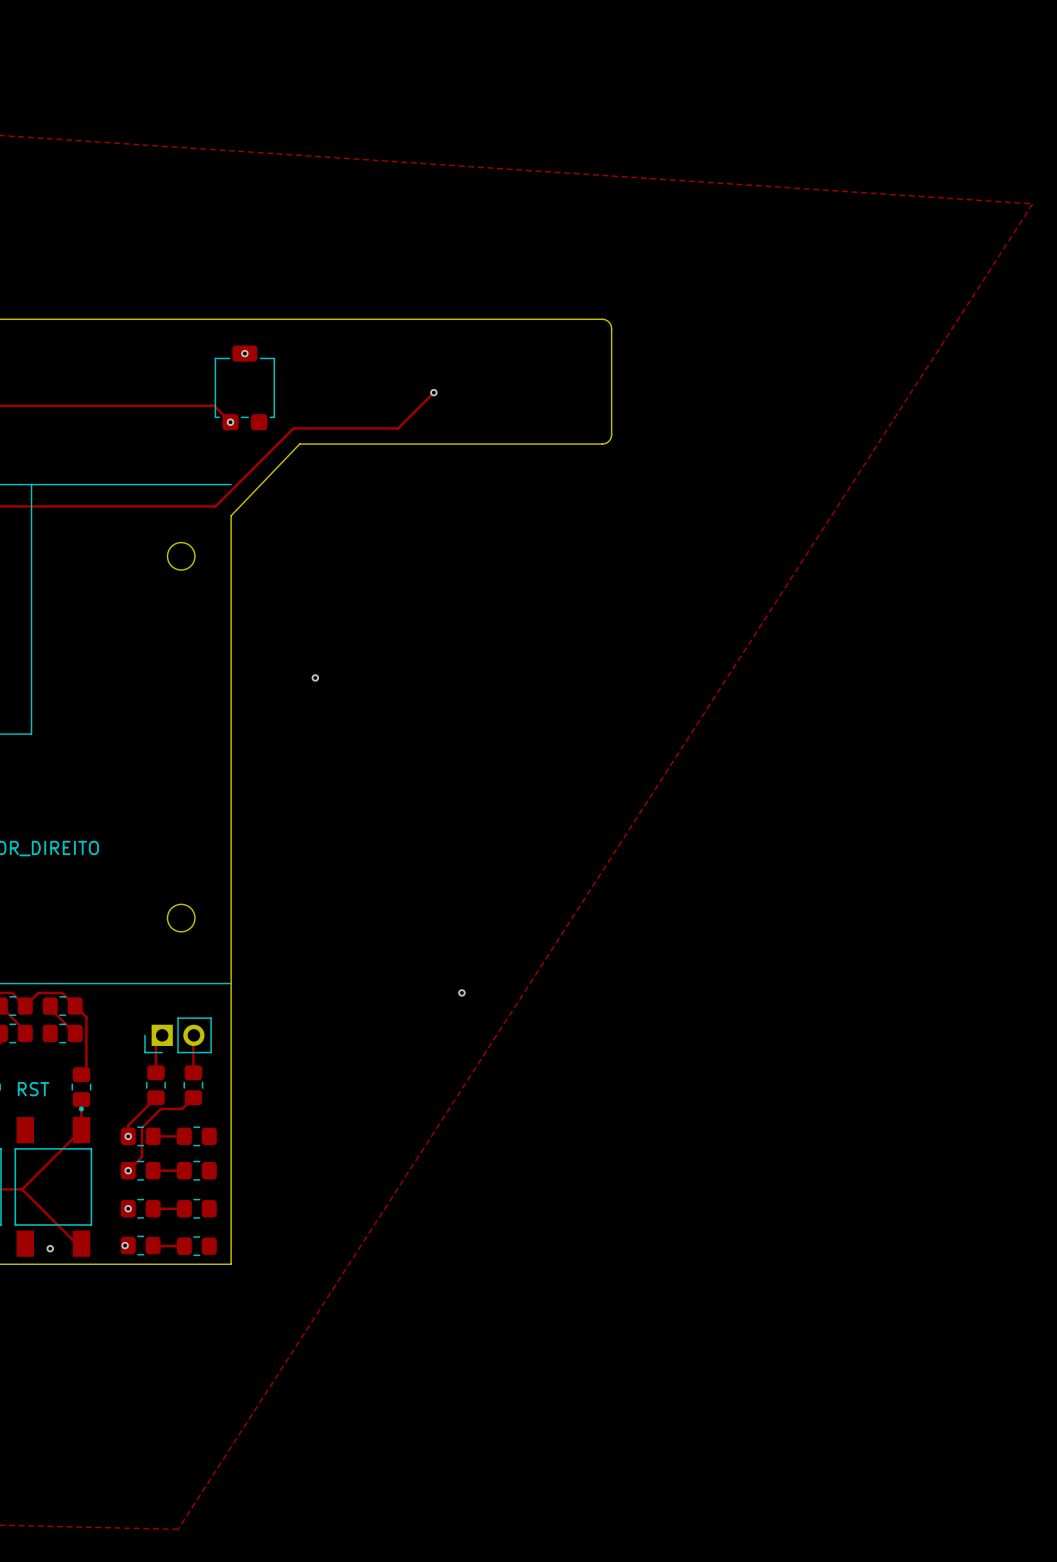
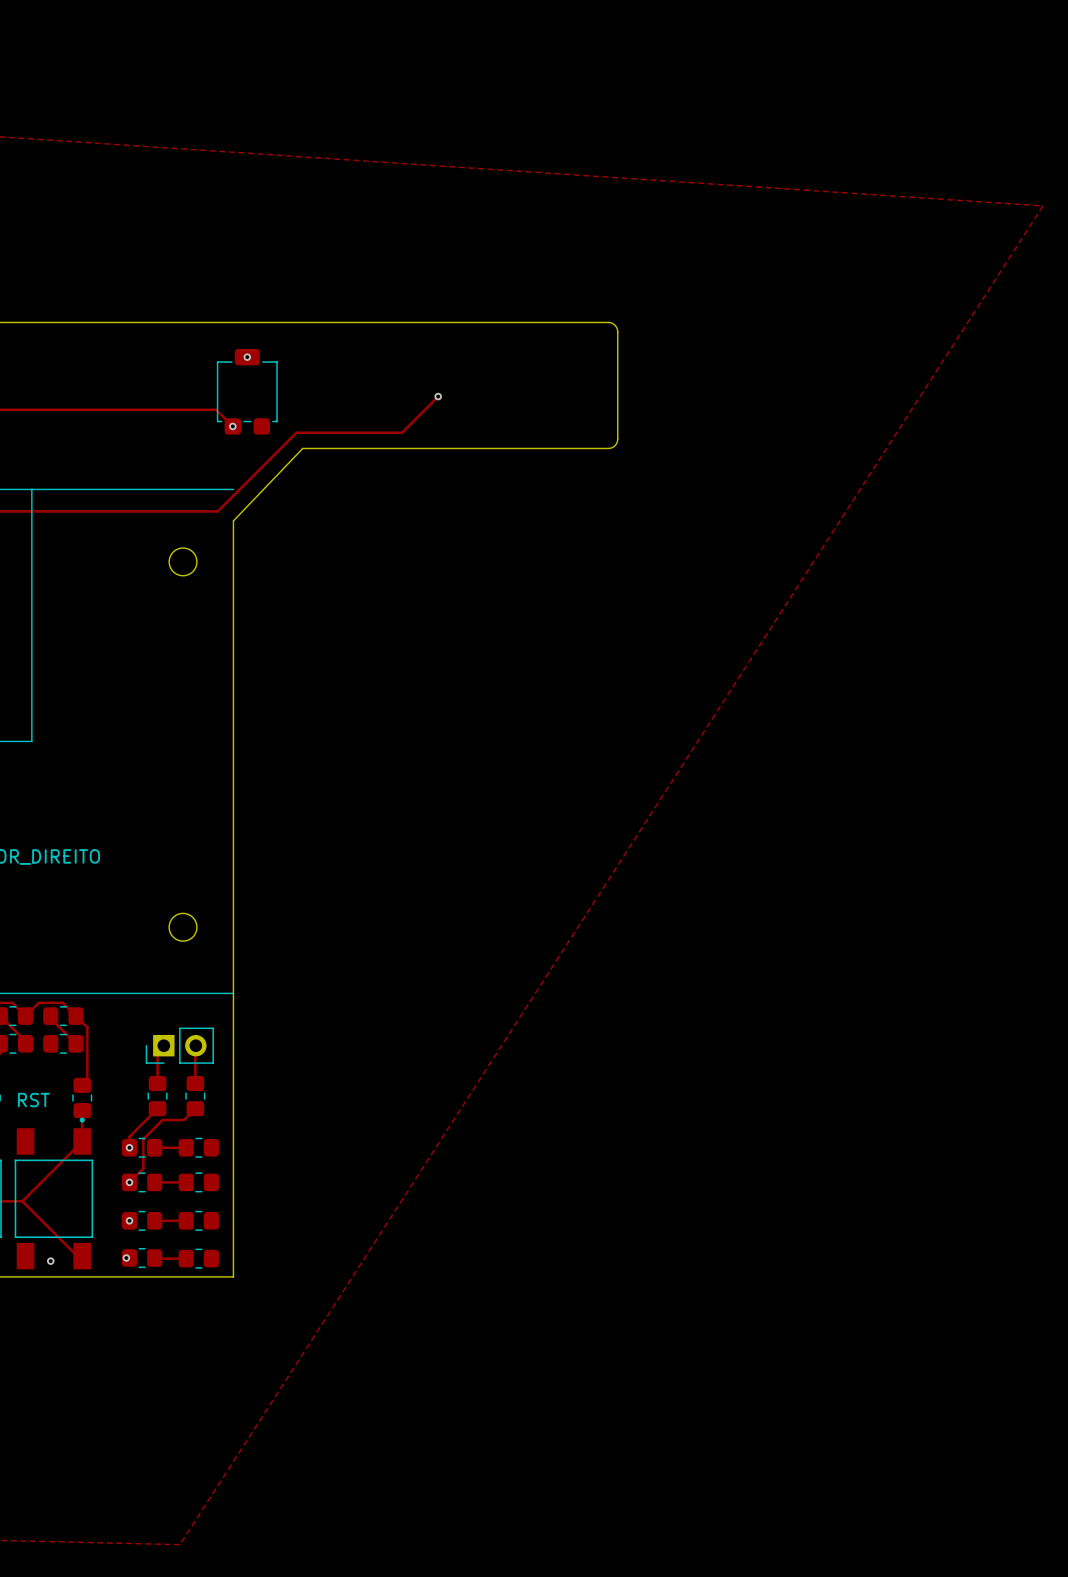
via: (315, 677) -> none
via: (461, 992) -> none

